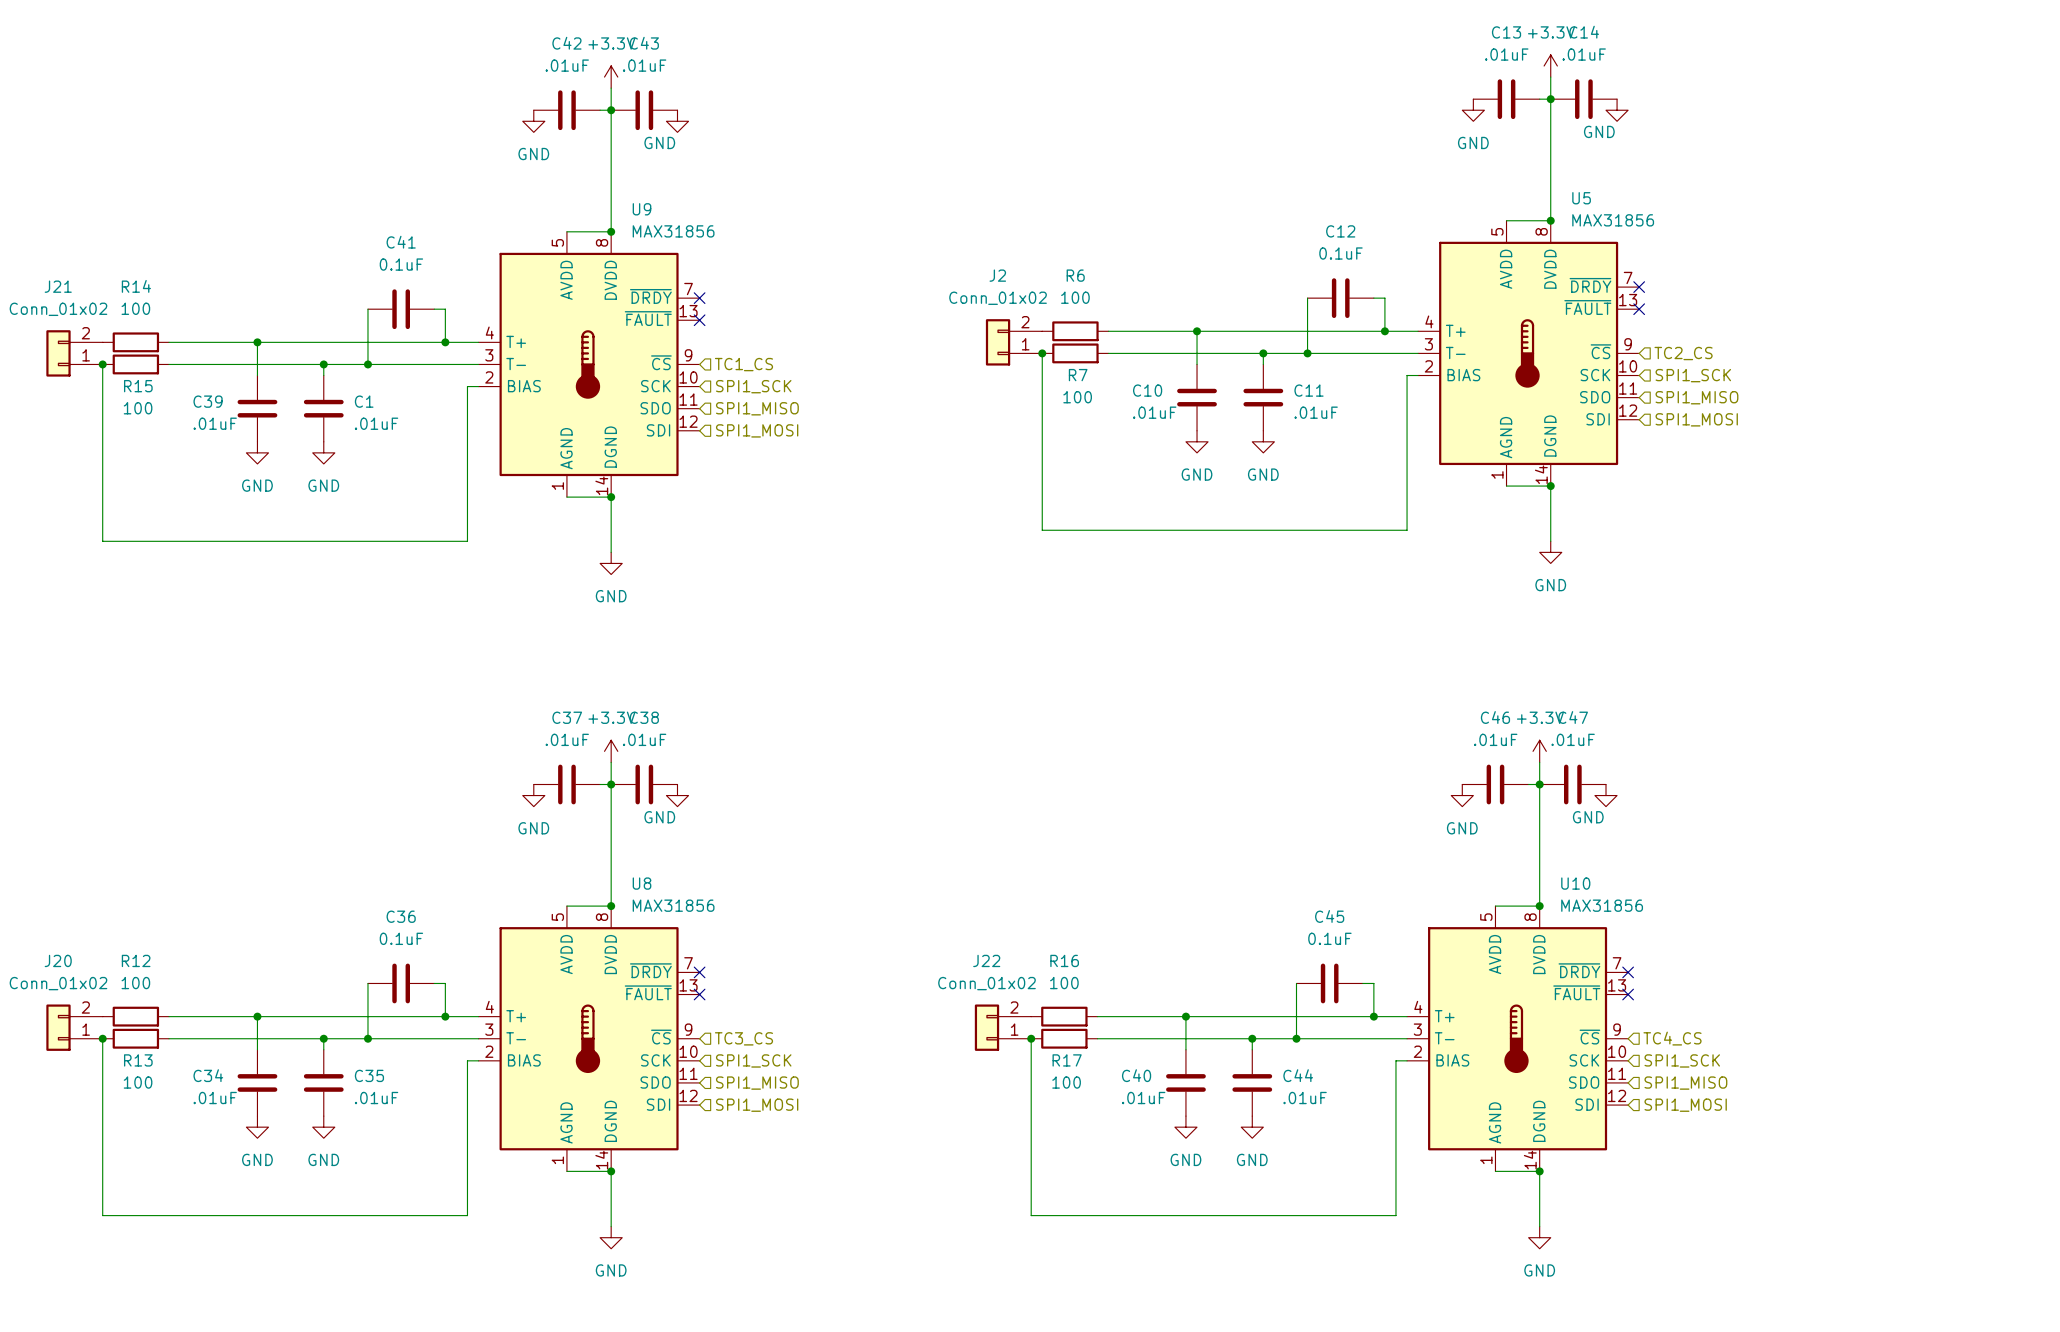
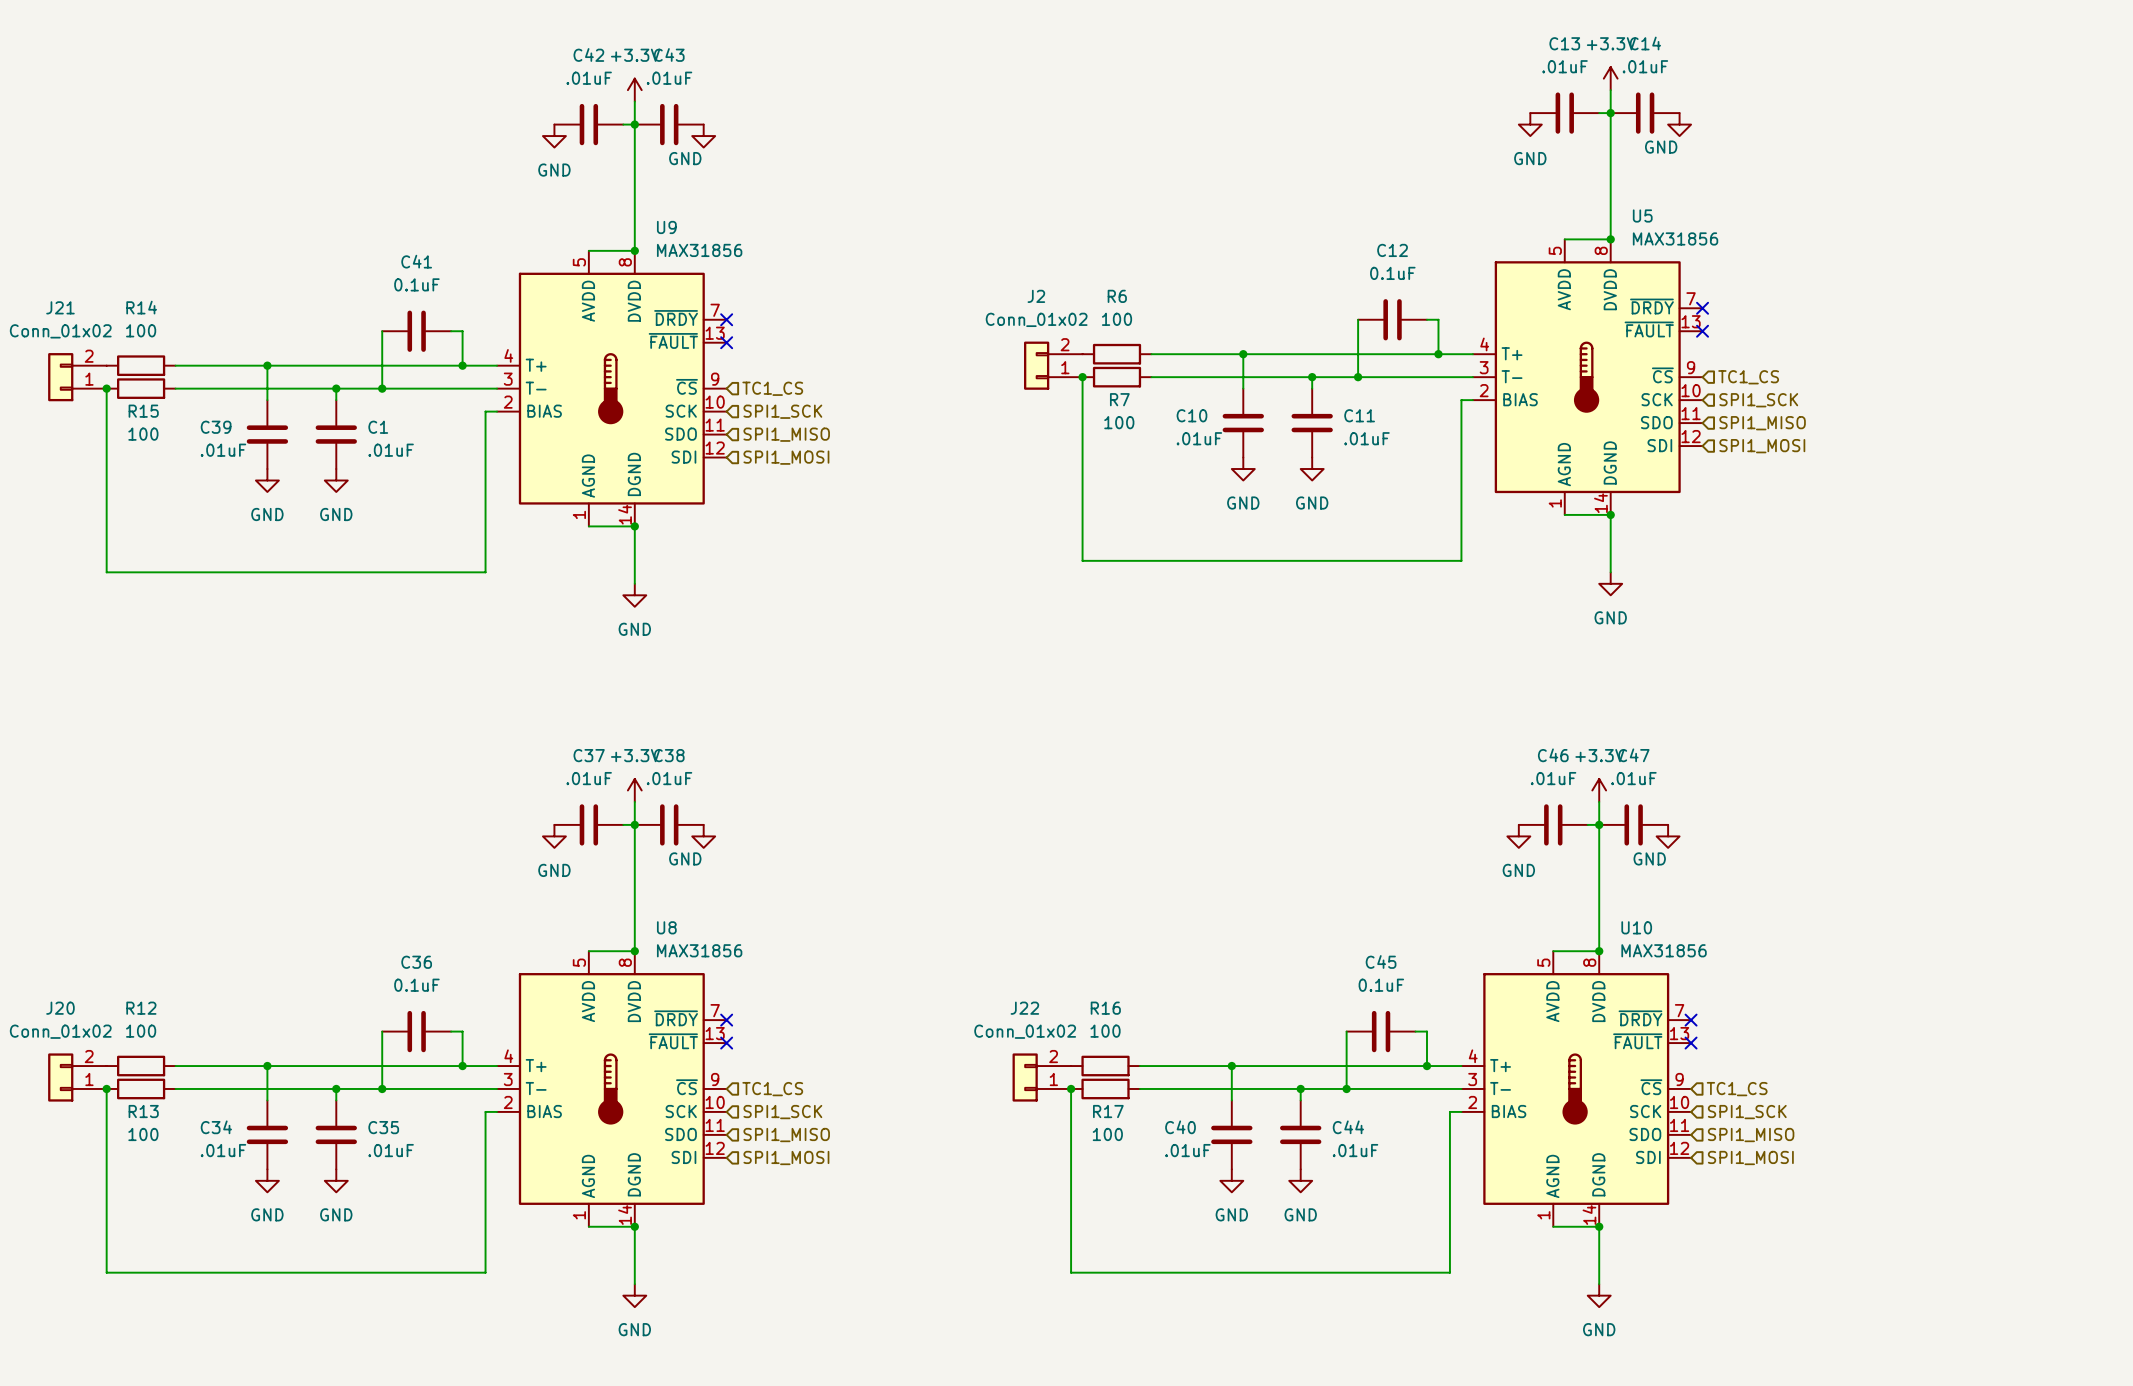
hierarchical label: TC2_CS (1683, 353) -> TC1_CS (1748, 377)
hierarchical label: TC3_CS (743, 1038) -> TC1_CS (772, 1089)
hierarchical label: TC4_CS (1672, 1038) -> TC1_CS (1737, 1089)

